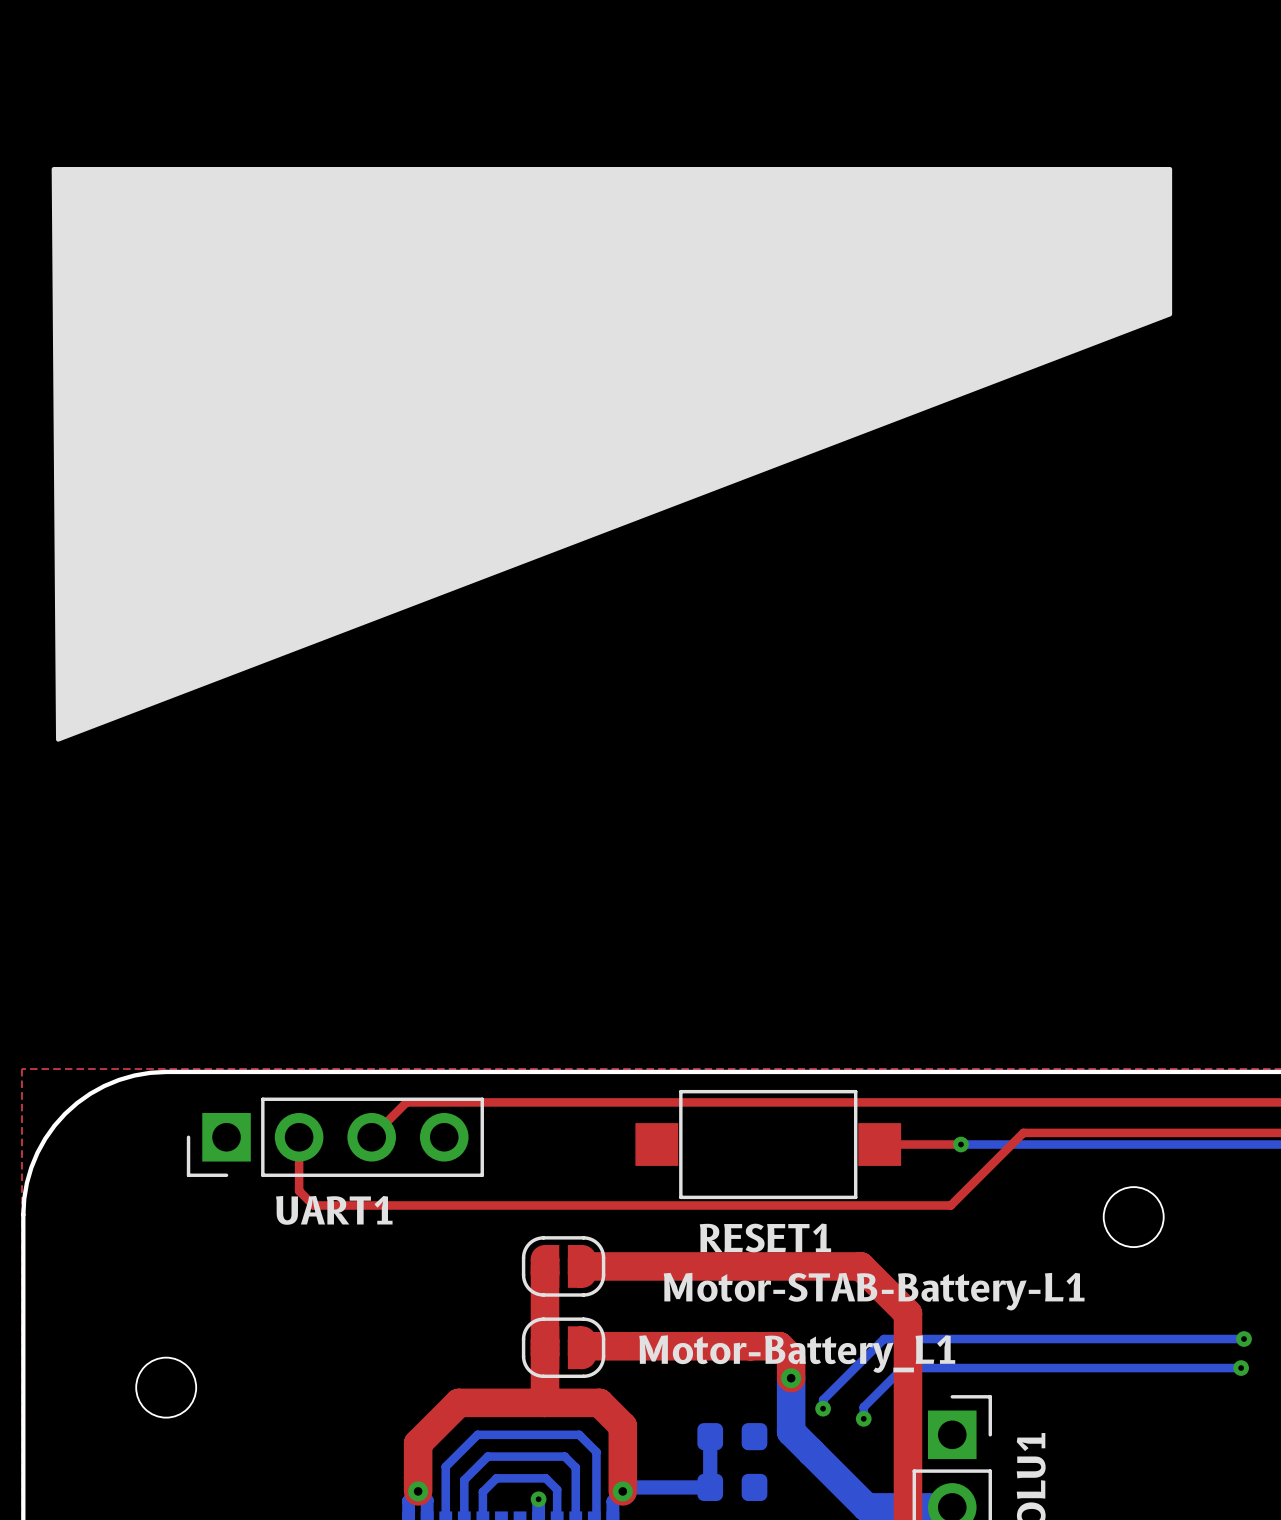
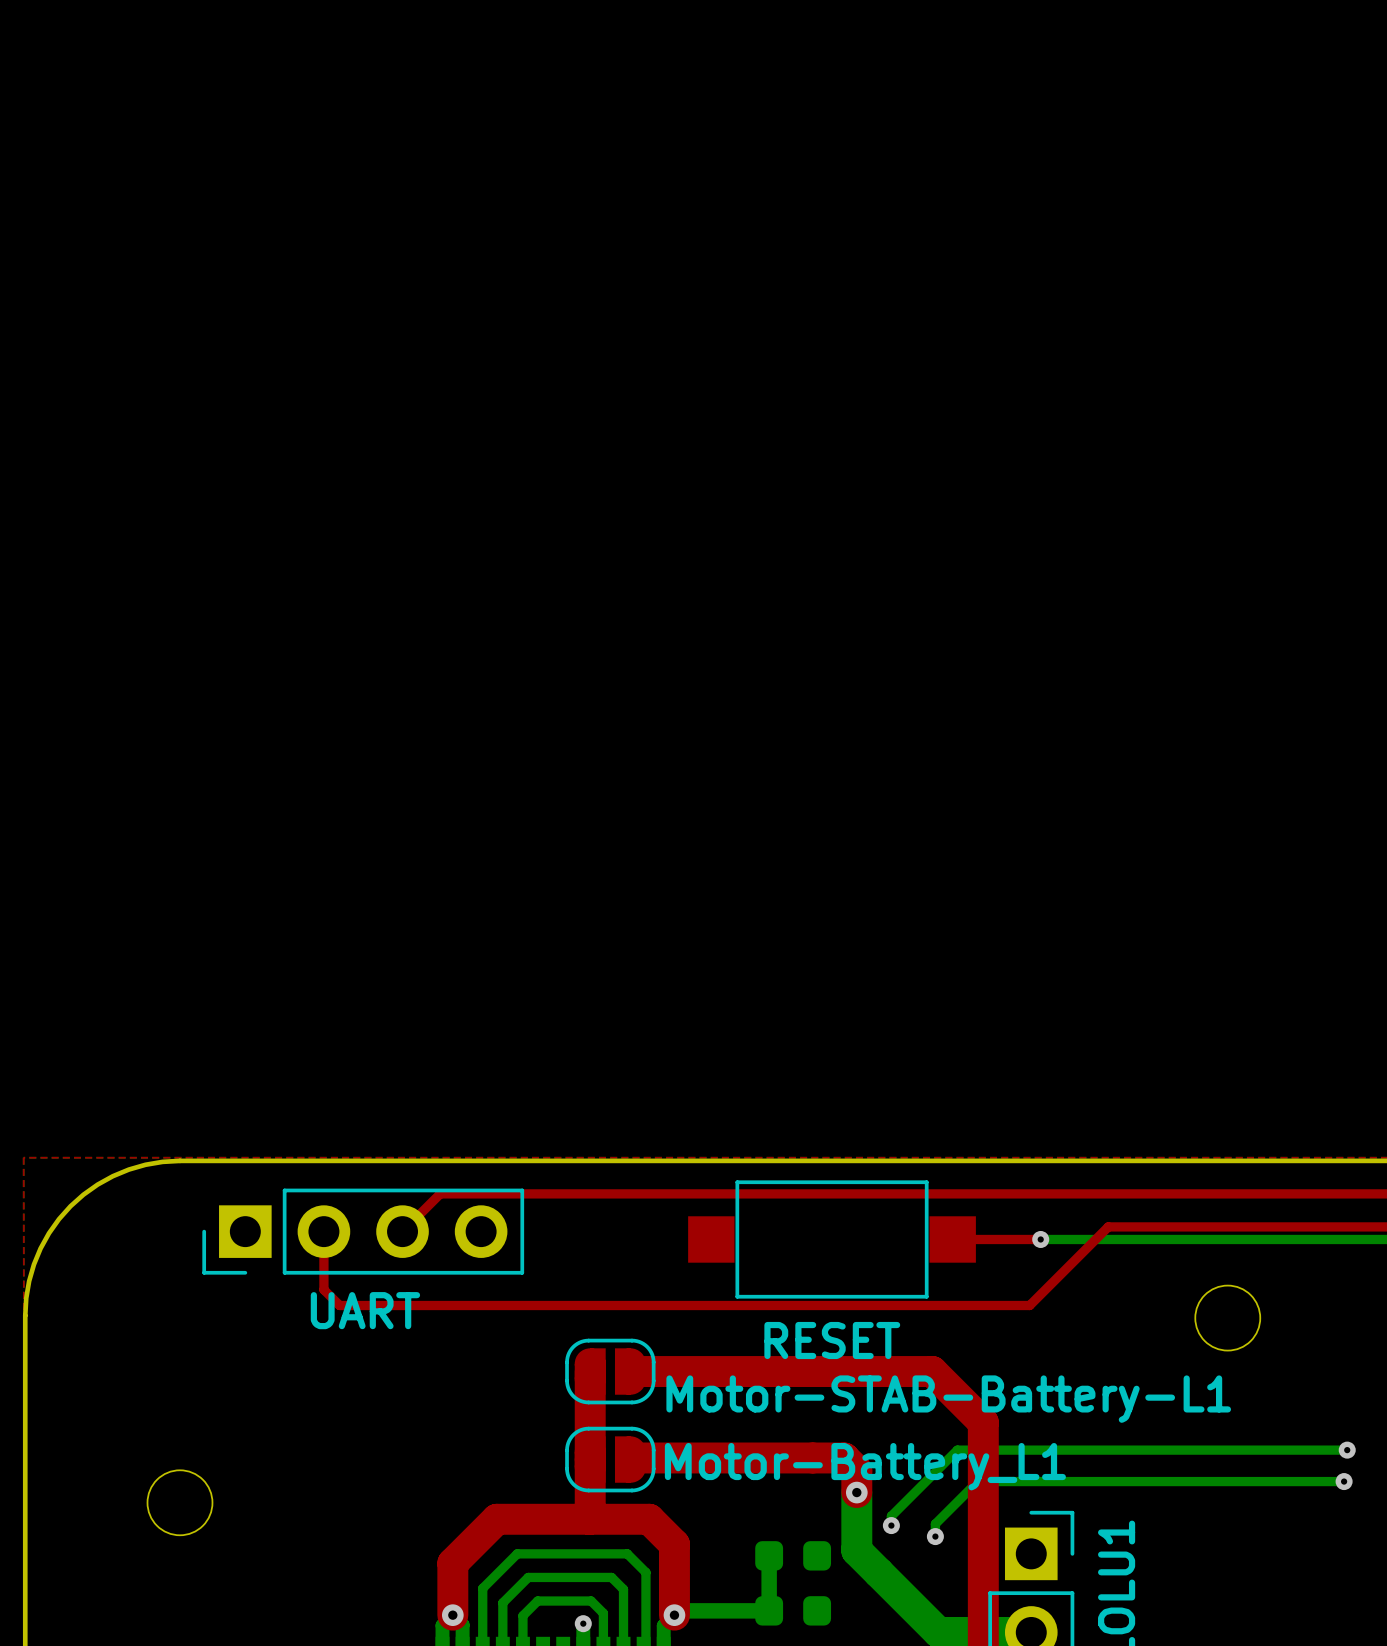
drawing: [51, 166, 1173, 742] -> none
UART1 name: UART1 (334, 1210) -> UART (365, 1310)
RESET1 name: RESET1 (765, 1237) -> RESET (832, 1340)

